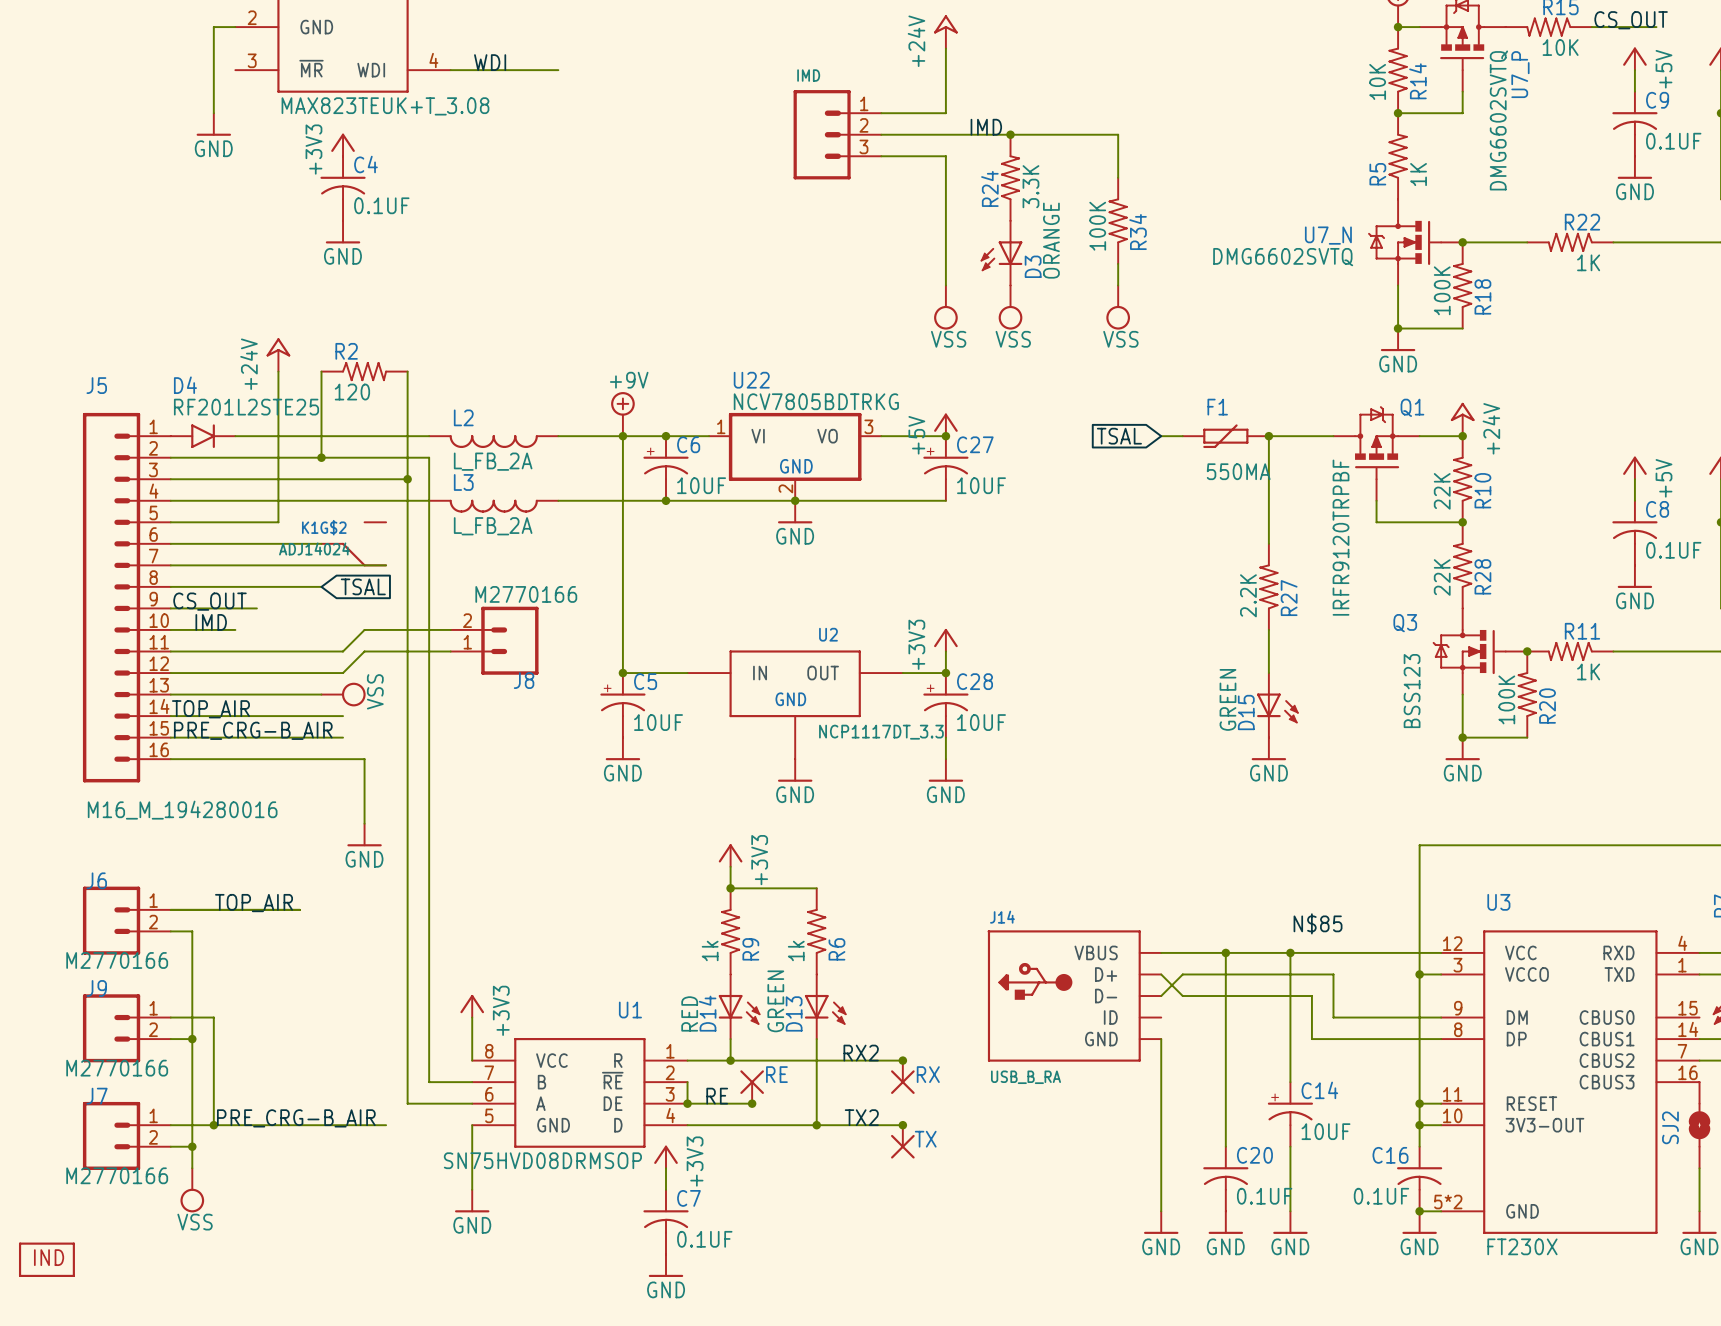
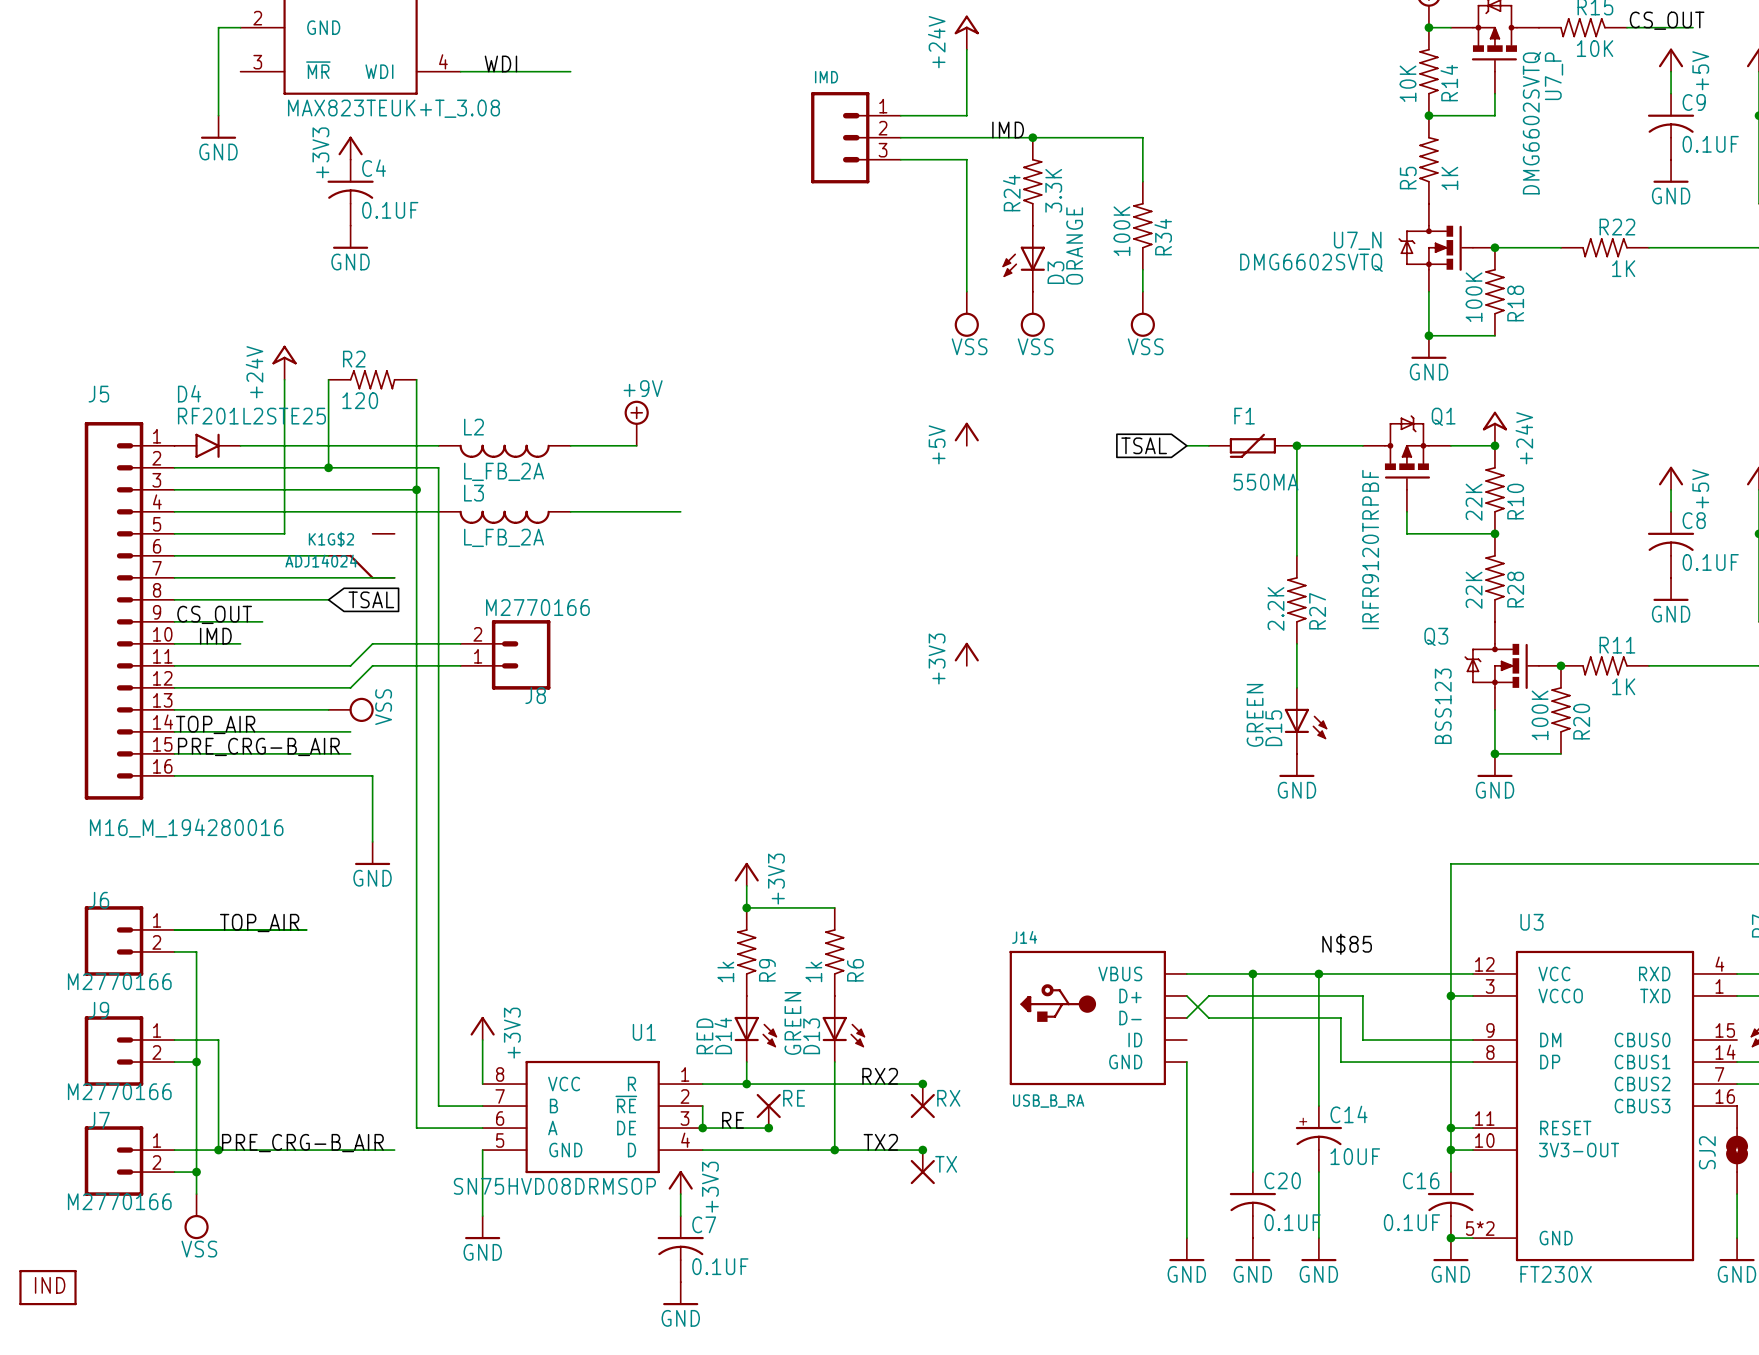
junction: (622, 436) -> none
junction: (666, 436) -> none
wire: (709, 436) (622, 436) (622, 673) (687, 673) -> none
wire: (881, 436) (945, 436) -> none
junction: (945, 436) -> none
U22: NCV7805BDTRKG (795, 456) -> none
C6: 10UF (666, 468) -> none
C27: 10UF (945, 468) -> none
wire: (666, 500) (945, 500) -> none
junction: (666, 500) -> none
junction: (795, 500) -> none
power symbol: GND (795, 512) -> none
wire: (945, 651) (945, 673) (902, 673) -> none
junction: (622, 673) -> none
junction: (945, 673) -> none
U2: NCP1117DT_3.3 (795, 704) -> none
C5: 10UF (622, 705) -> none
C28: 10UF (945, 705) -> none
wire: (945, 737) (945, 759) -> none
power symbol: GND (622, 748) -> none
power symbol: GND (795, 770) -> none
power symbol: GND (945, 770) -> none

